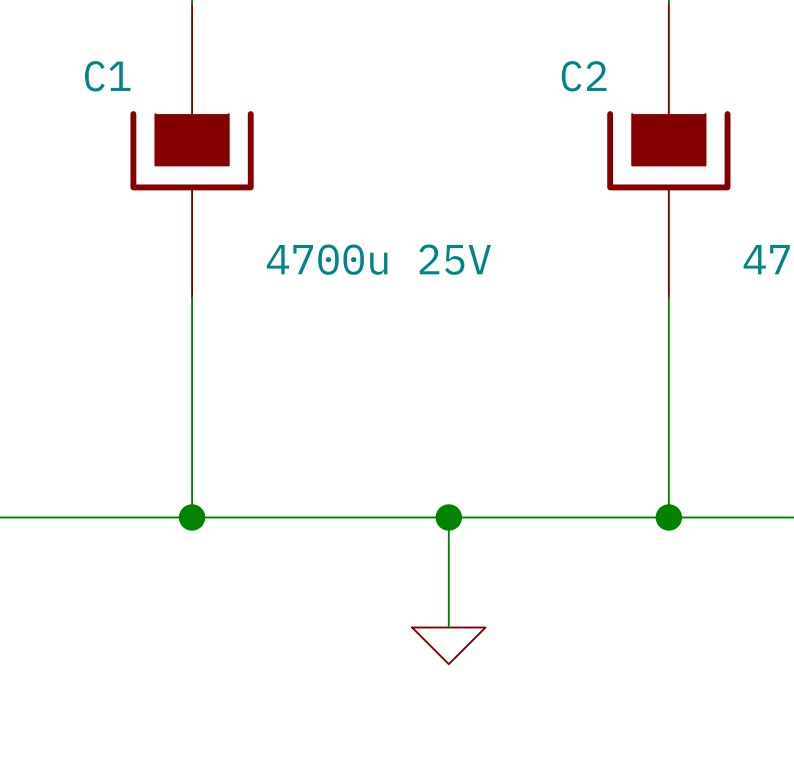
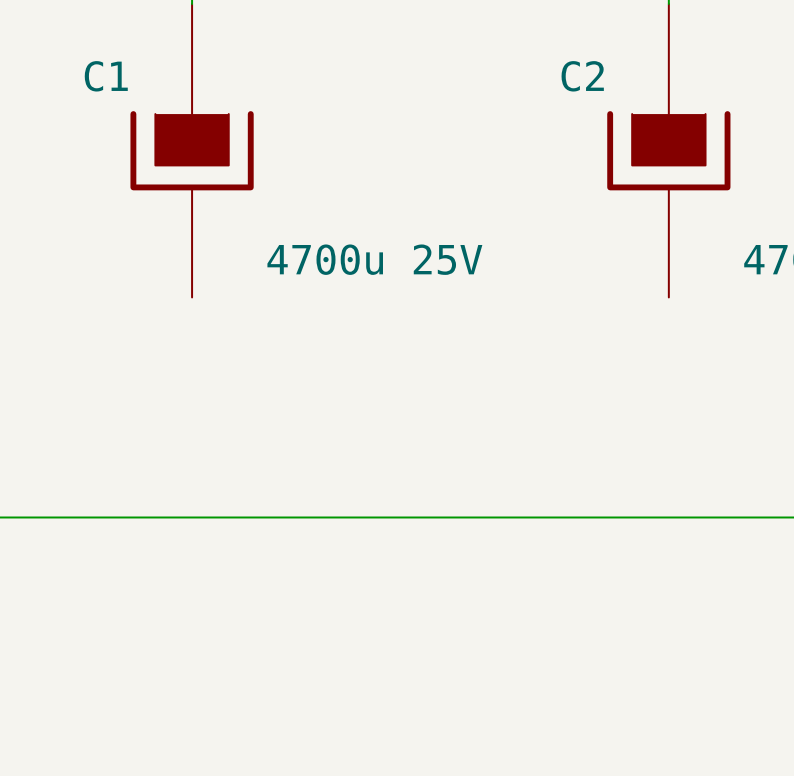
wire: (192, 297) (192, 517) -> none
wire: (668, 297) (668, 517) -> none
junction: (192, 517) -> none
wire: (448, 517) (448, 627) -> none
junction: (448, 517) -> none
junction: (668, 517) -> none
power symbol: (448, 645) -> none

